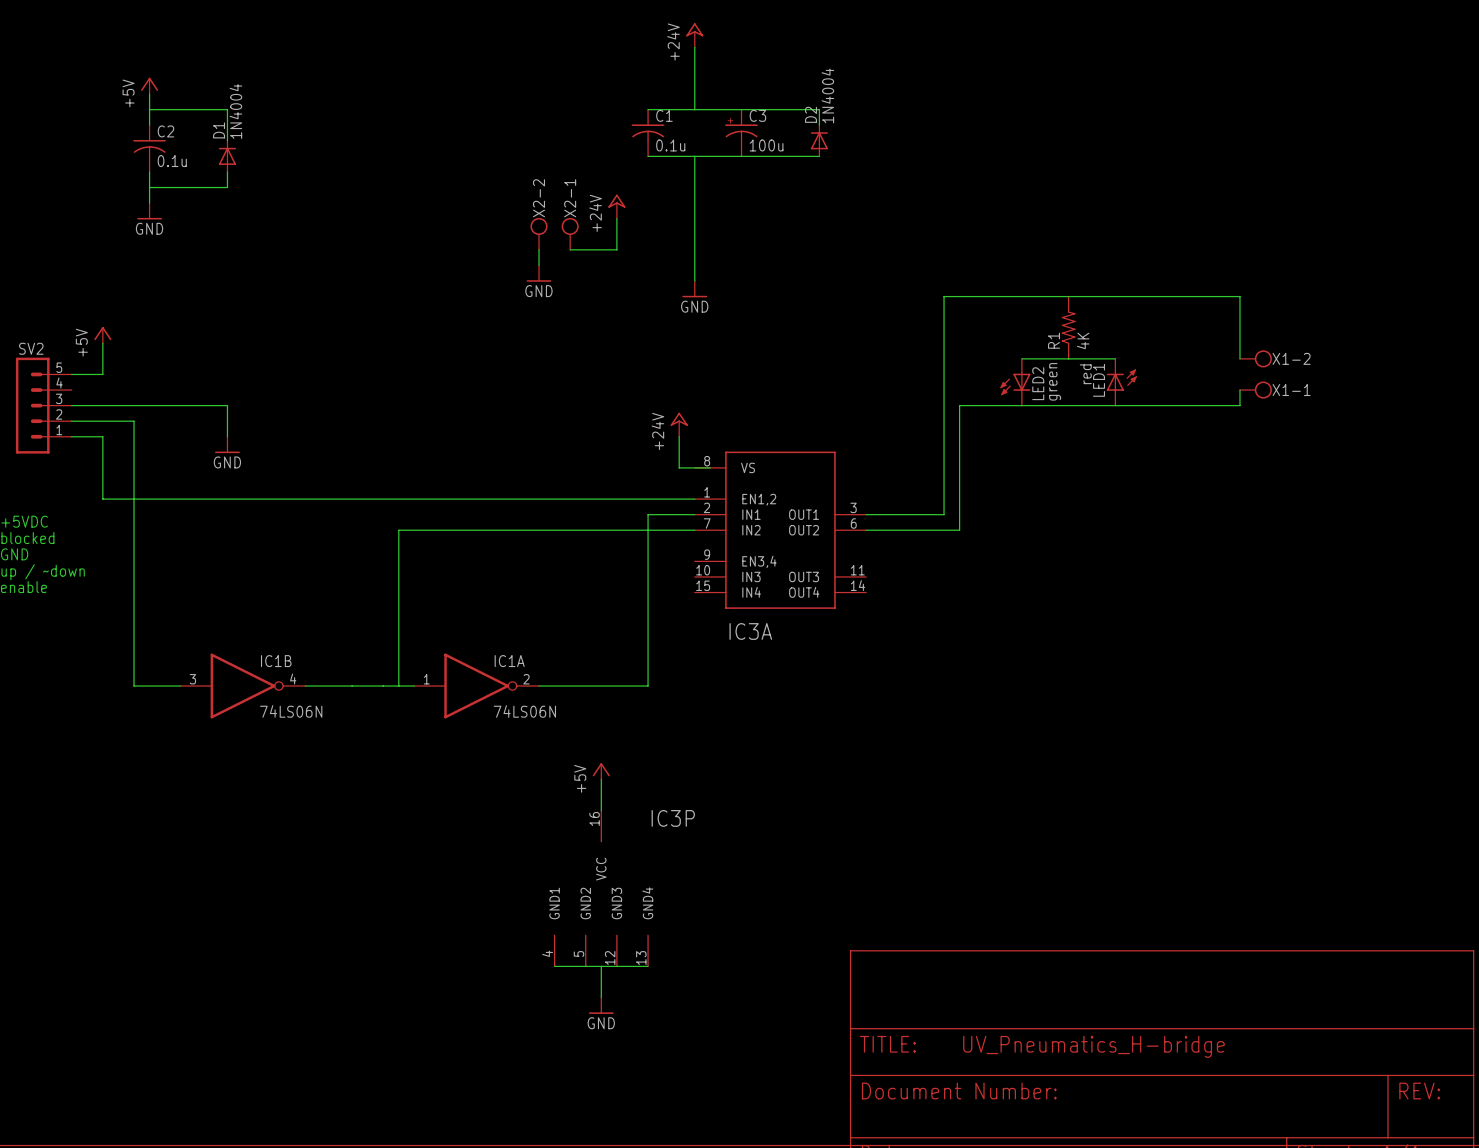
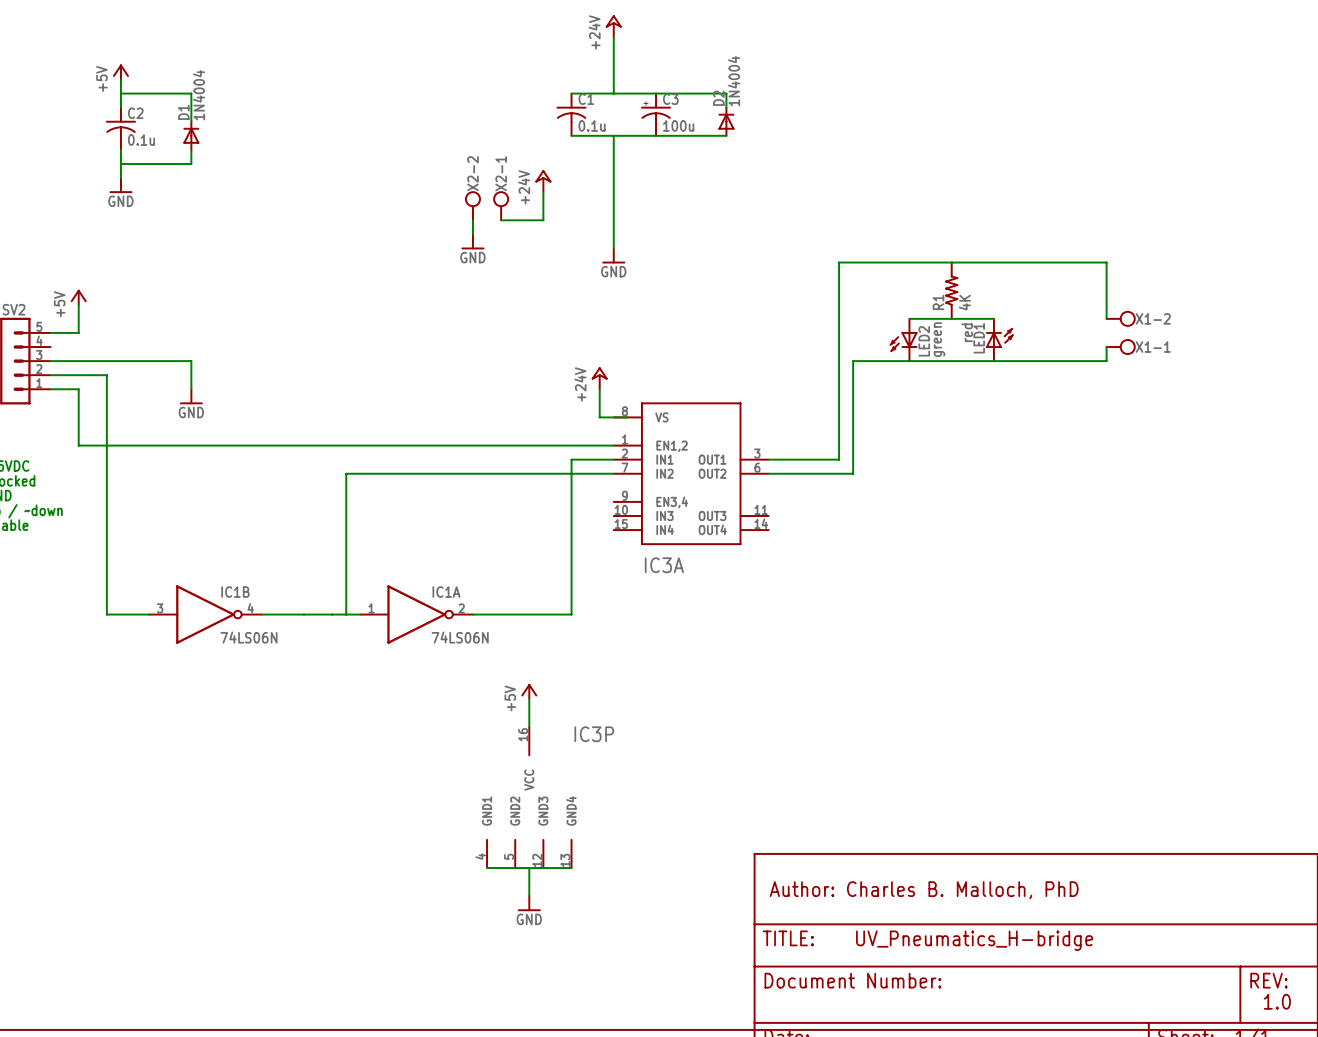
text: none -> Author: Charles B. Malloch, PhD (924, 890)
text: none -> 1.0 (1277, 1001)

